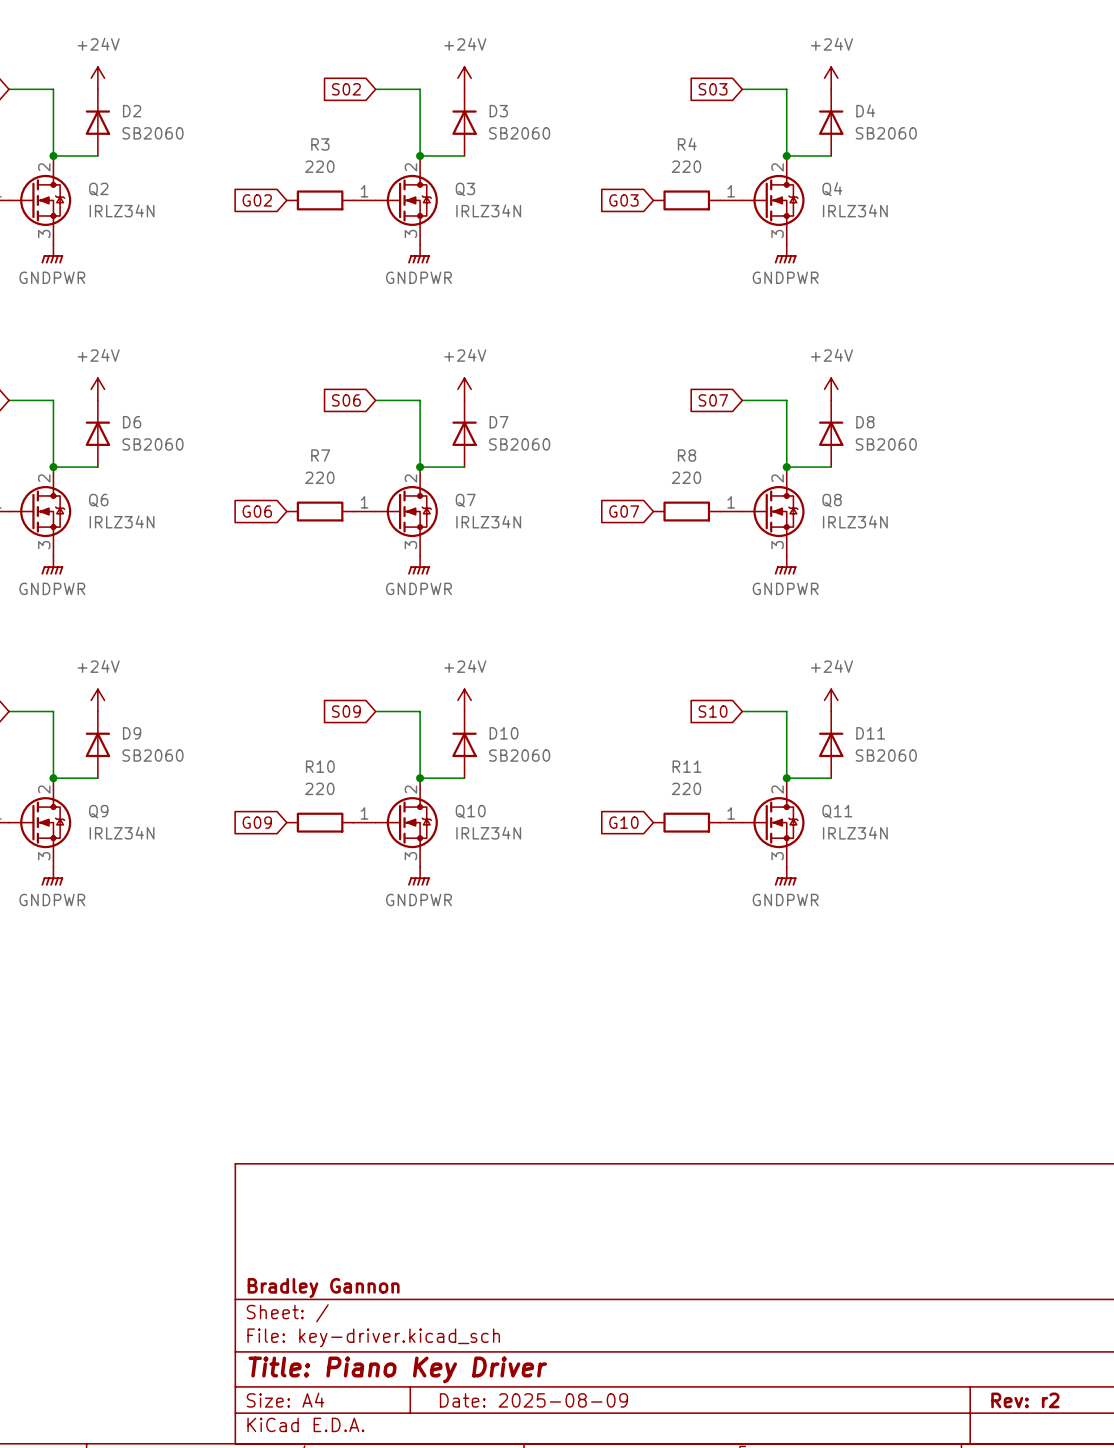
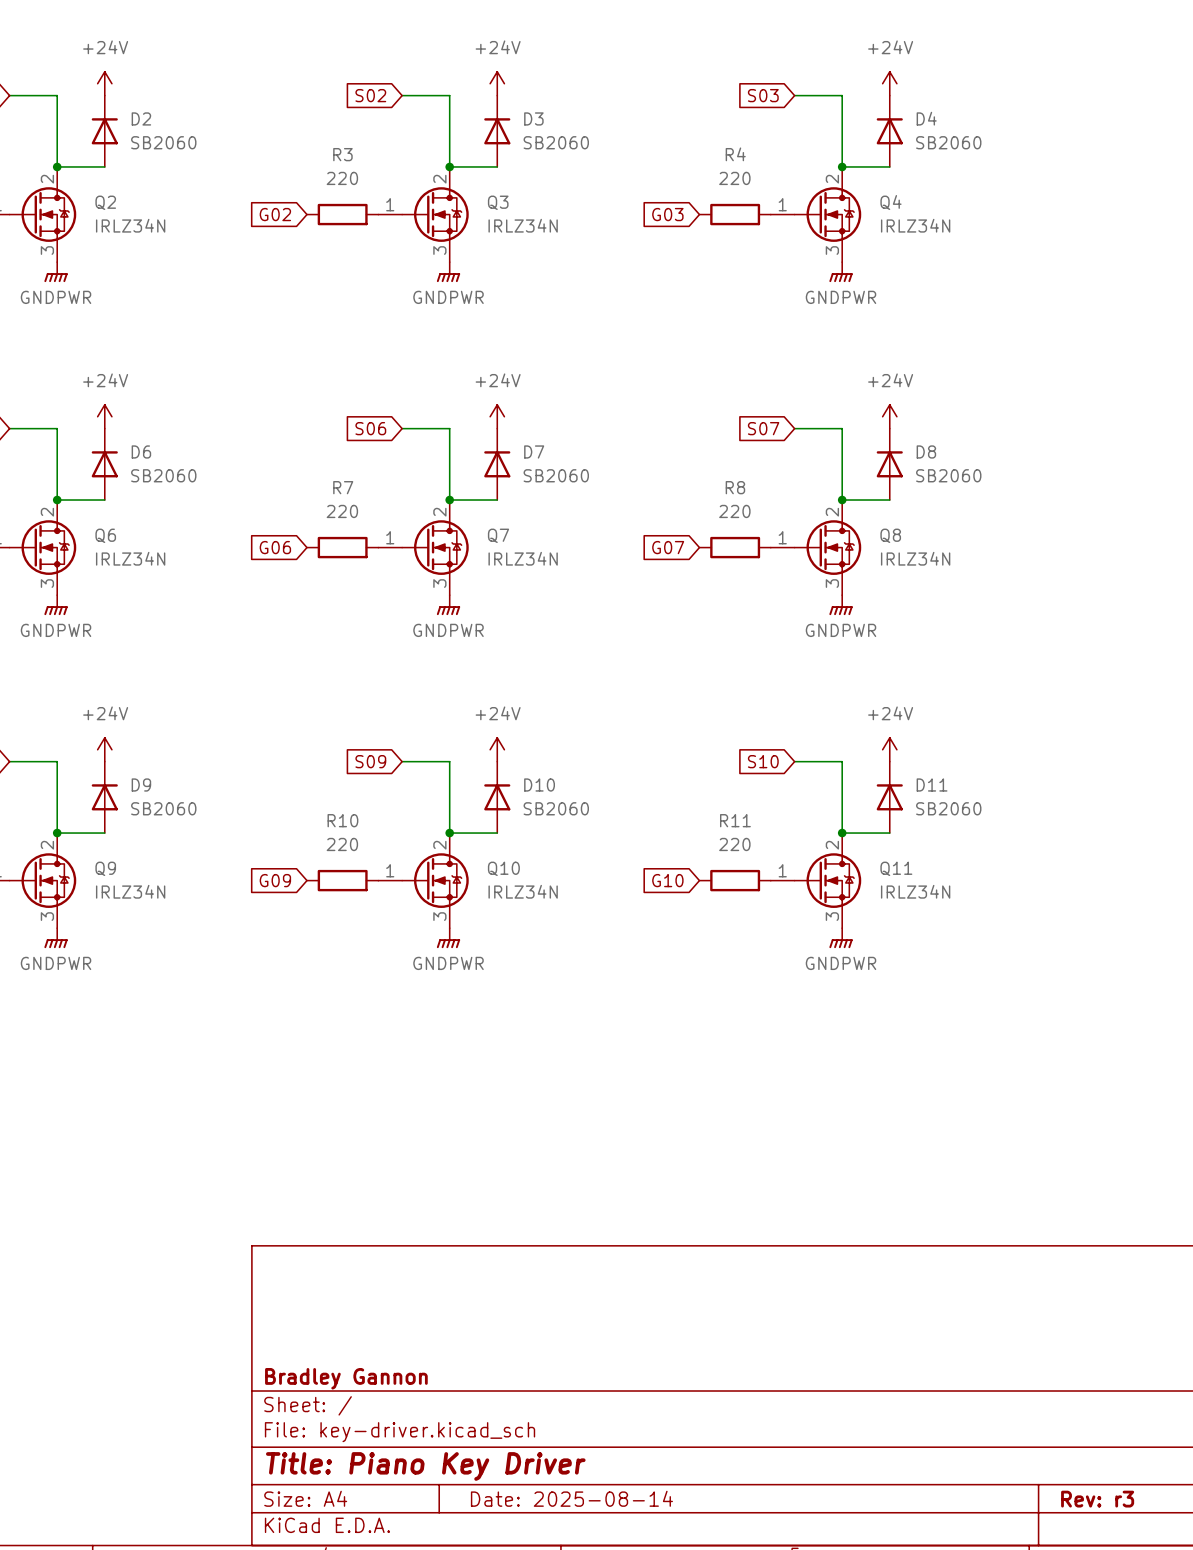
title block: Date: 2025-08-09 (533, 1400) -> Date: 2025-08-14 (571, 1498)
title block: Rev: r2 (1025, 1400) -> Rev: r3 (1097, 1499)

